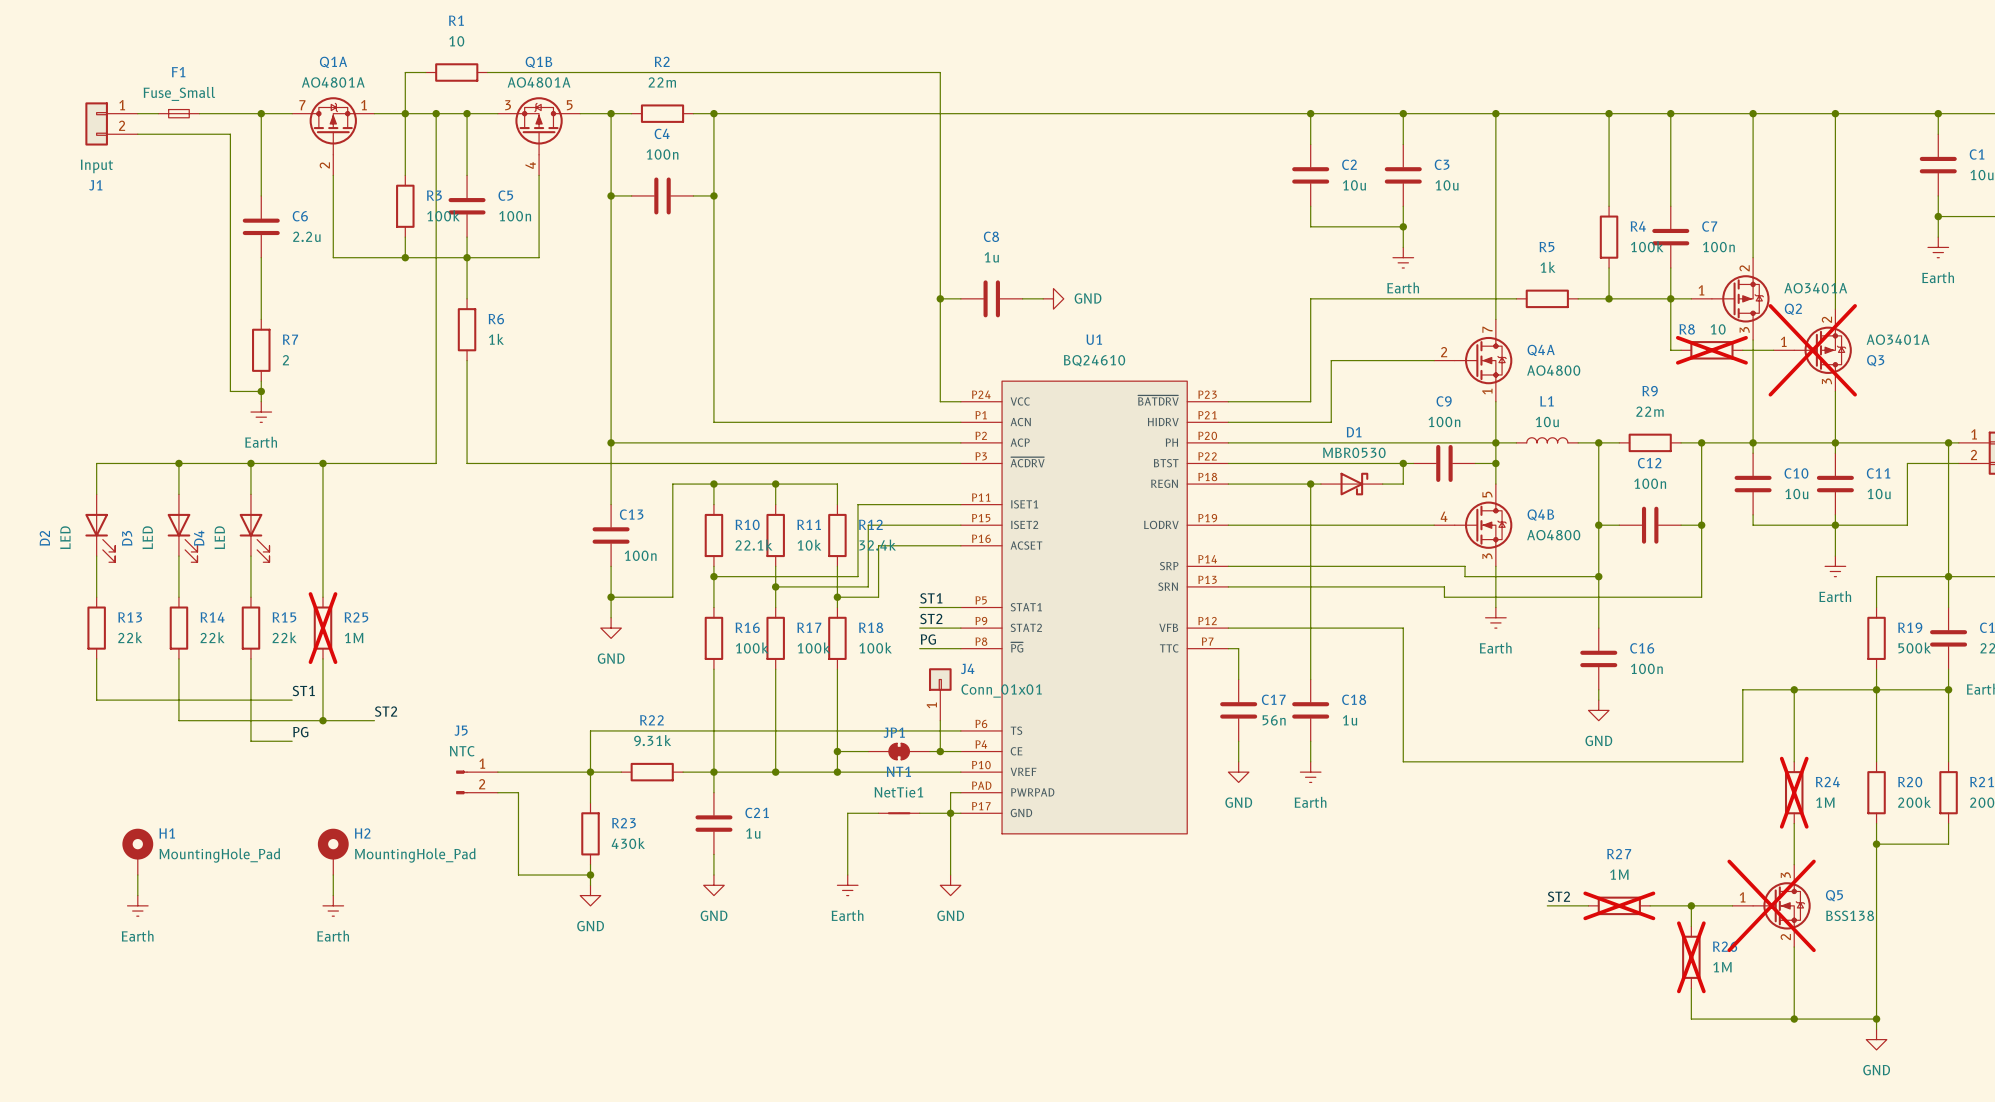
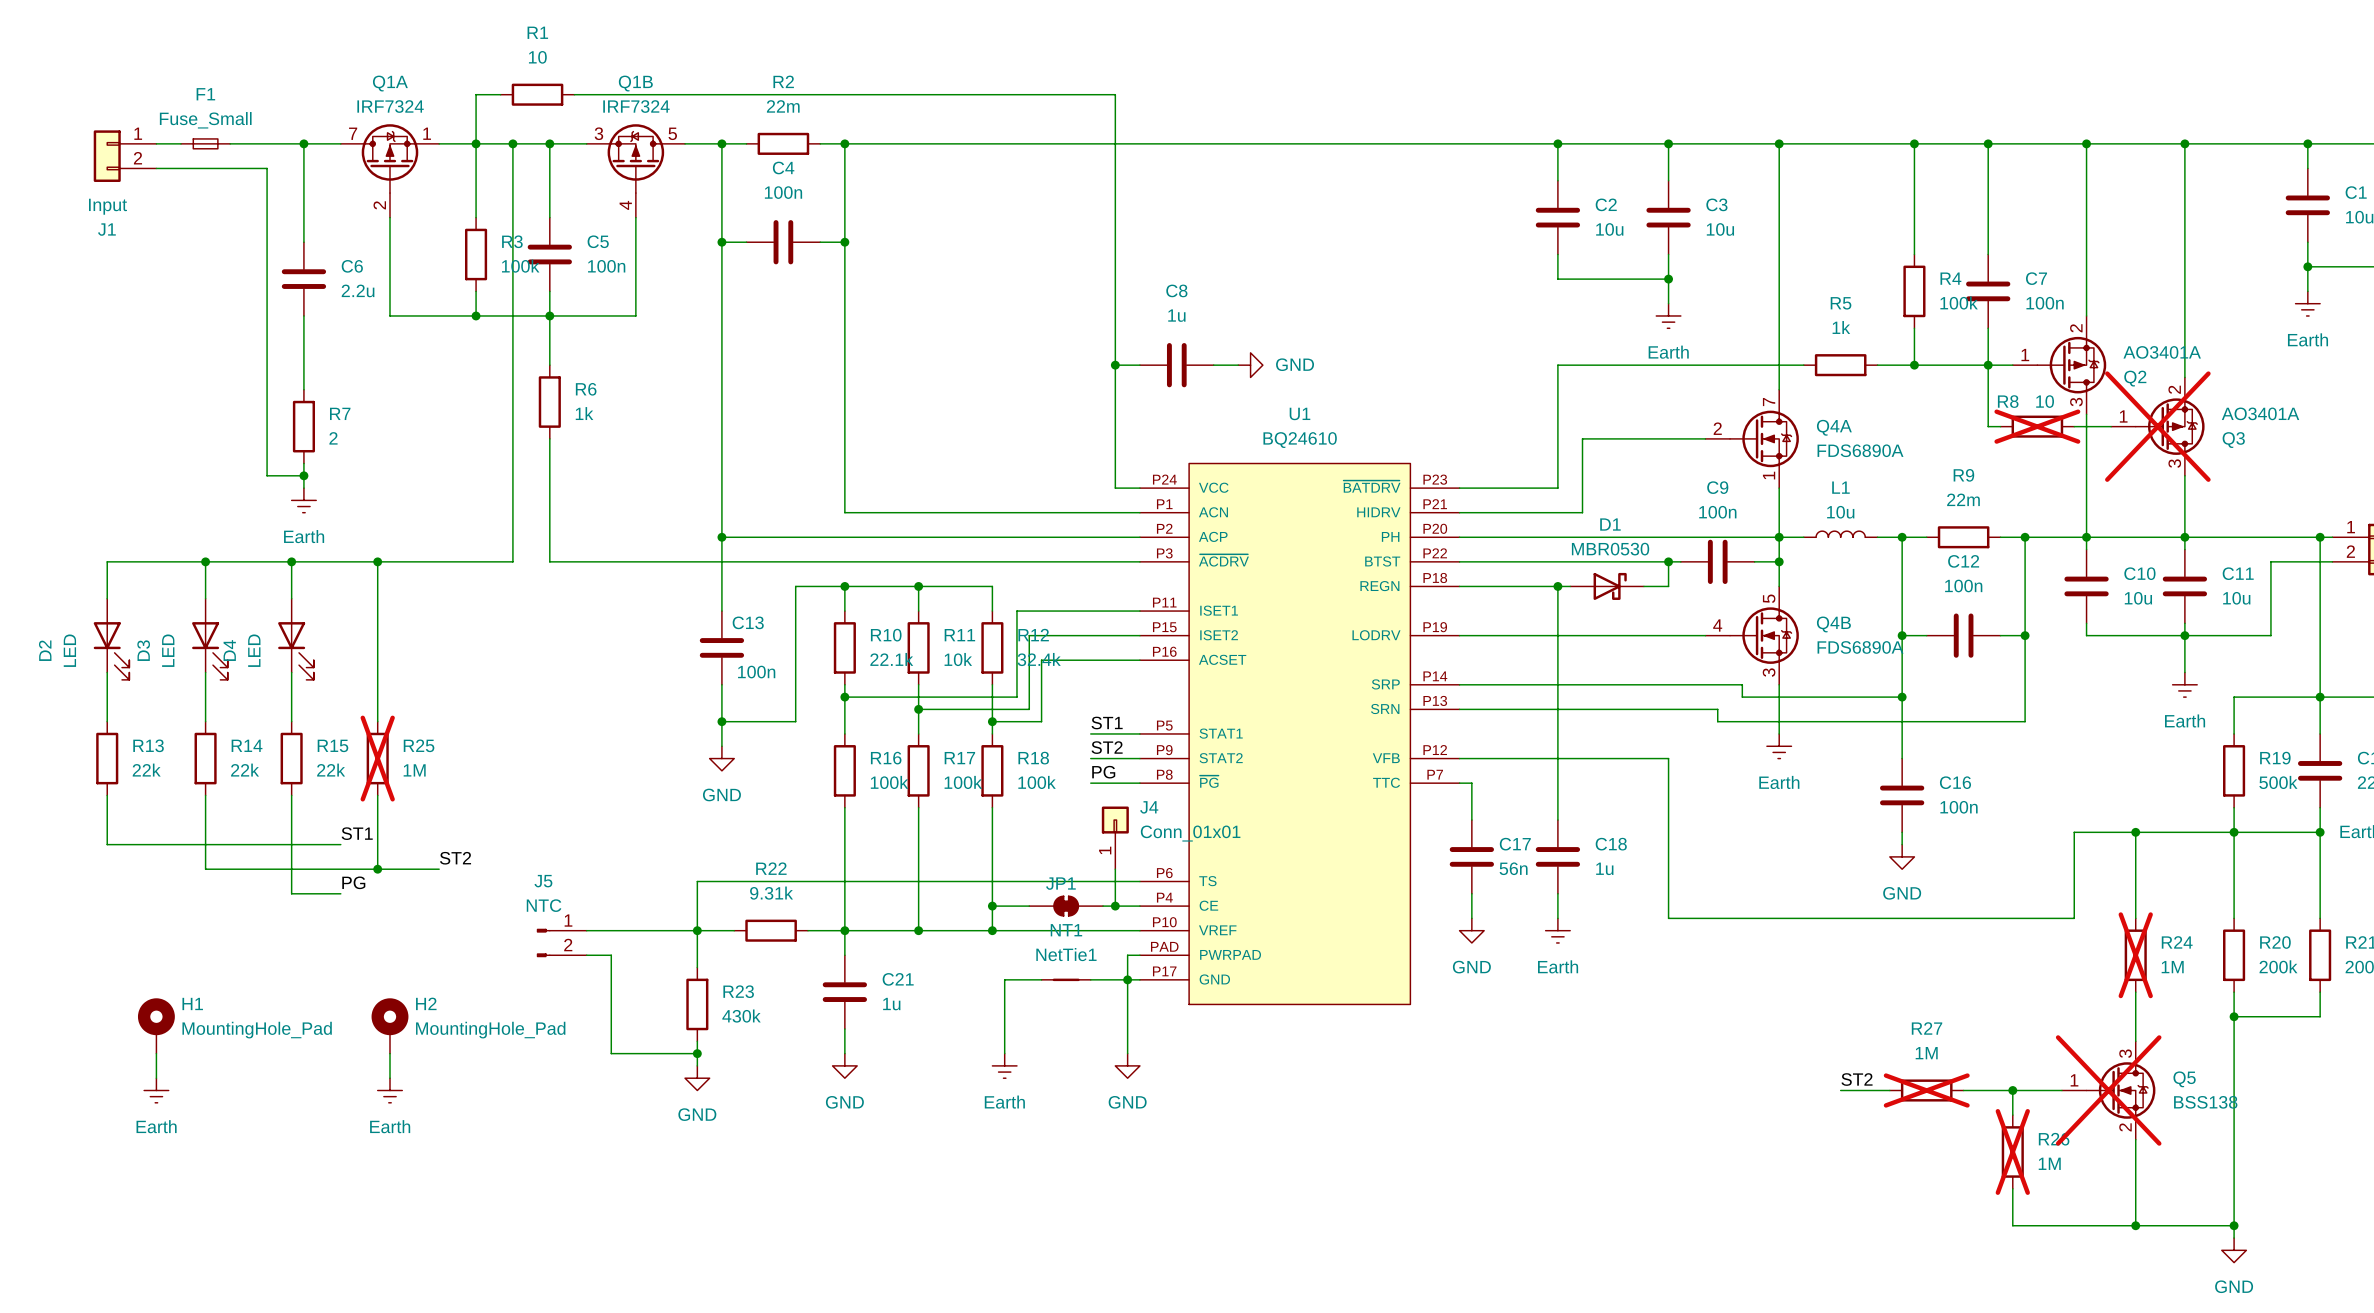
Q1A value: AO4801A (333, 82) -> IRF7324 (390, 106)
Q1B value: AO4801A (539, 82) -> IRF7324 (636, 106)
Q4A value: AO4800 (1553, 370) -> FDS6890A (1860, 450)
Q4B value: AO4800 (1553, 535) -> FDS6890A (1860, 647)

